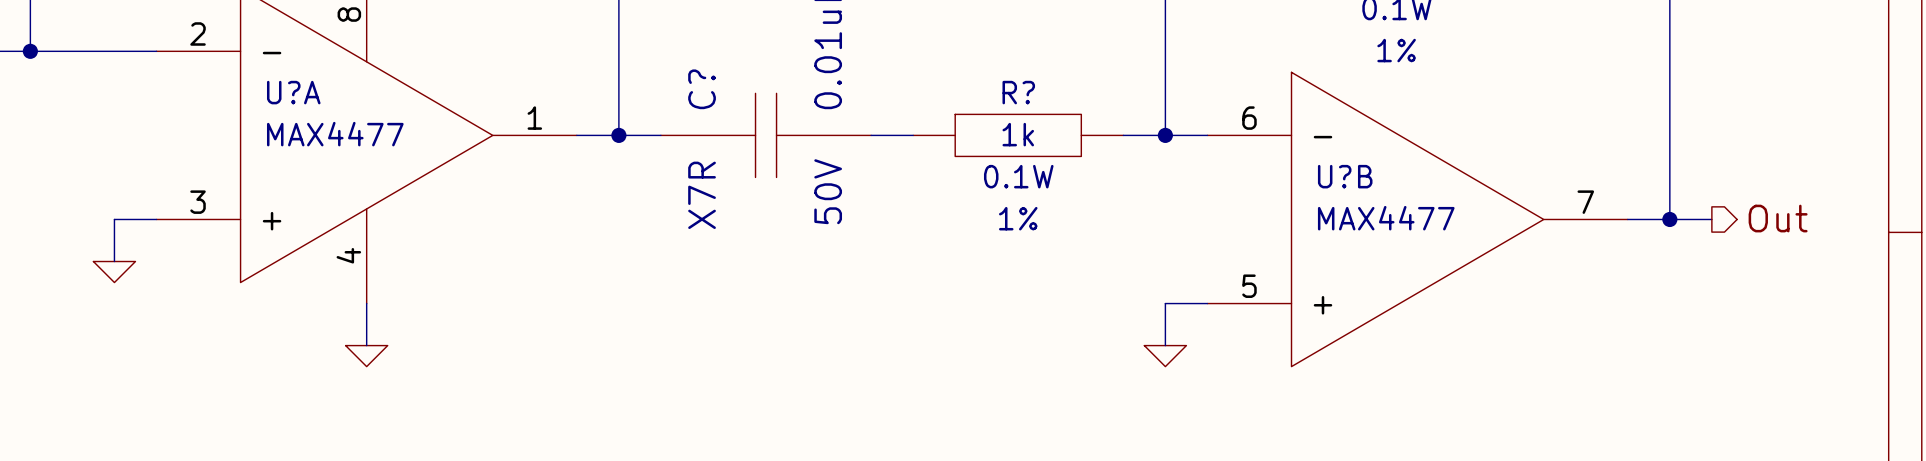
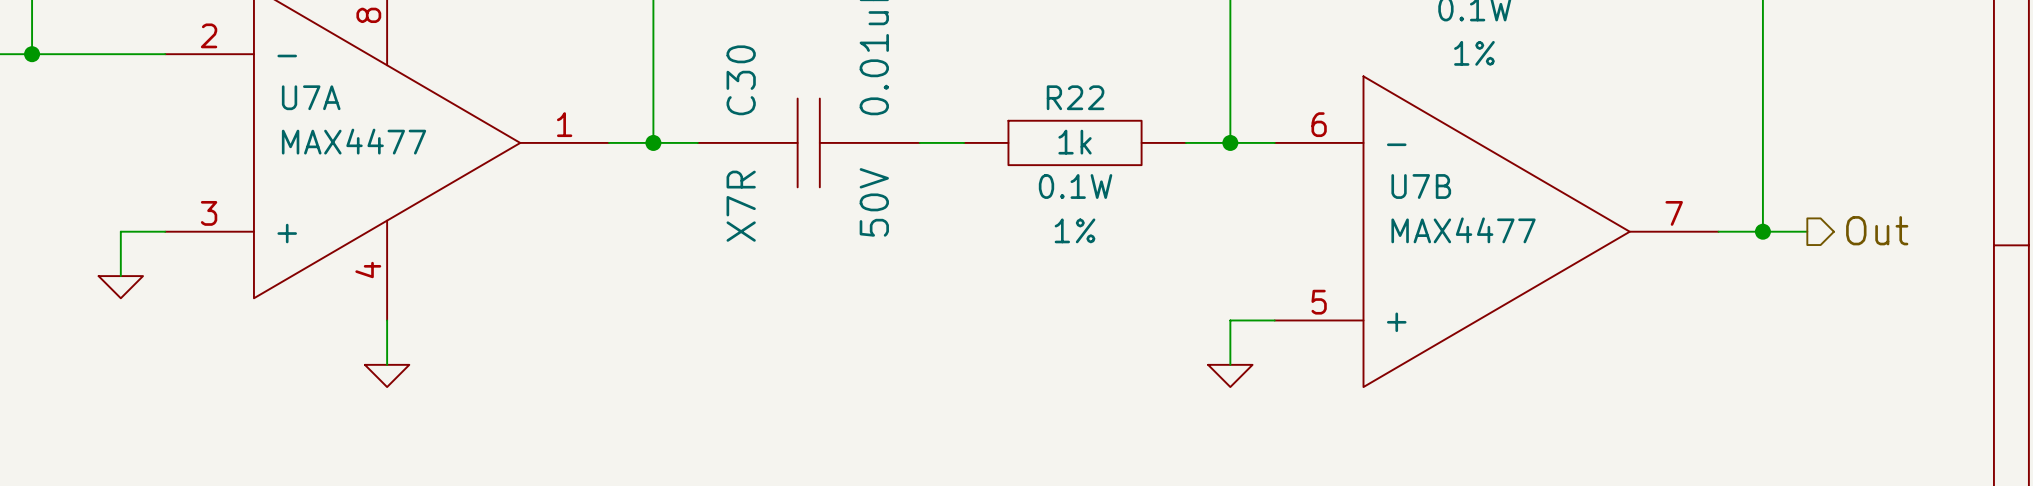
C? name: C? (702, 89) -> C30 (741, 80)
U?A name: U?A (293, 92) -> U7A (311, 97)
R? name: R? (1018, 92) -> R22 (1075, 97)
U?B name: U?B (1345, 176) -> U7B (1421, 186)

